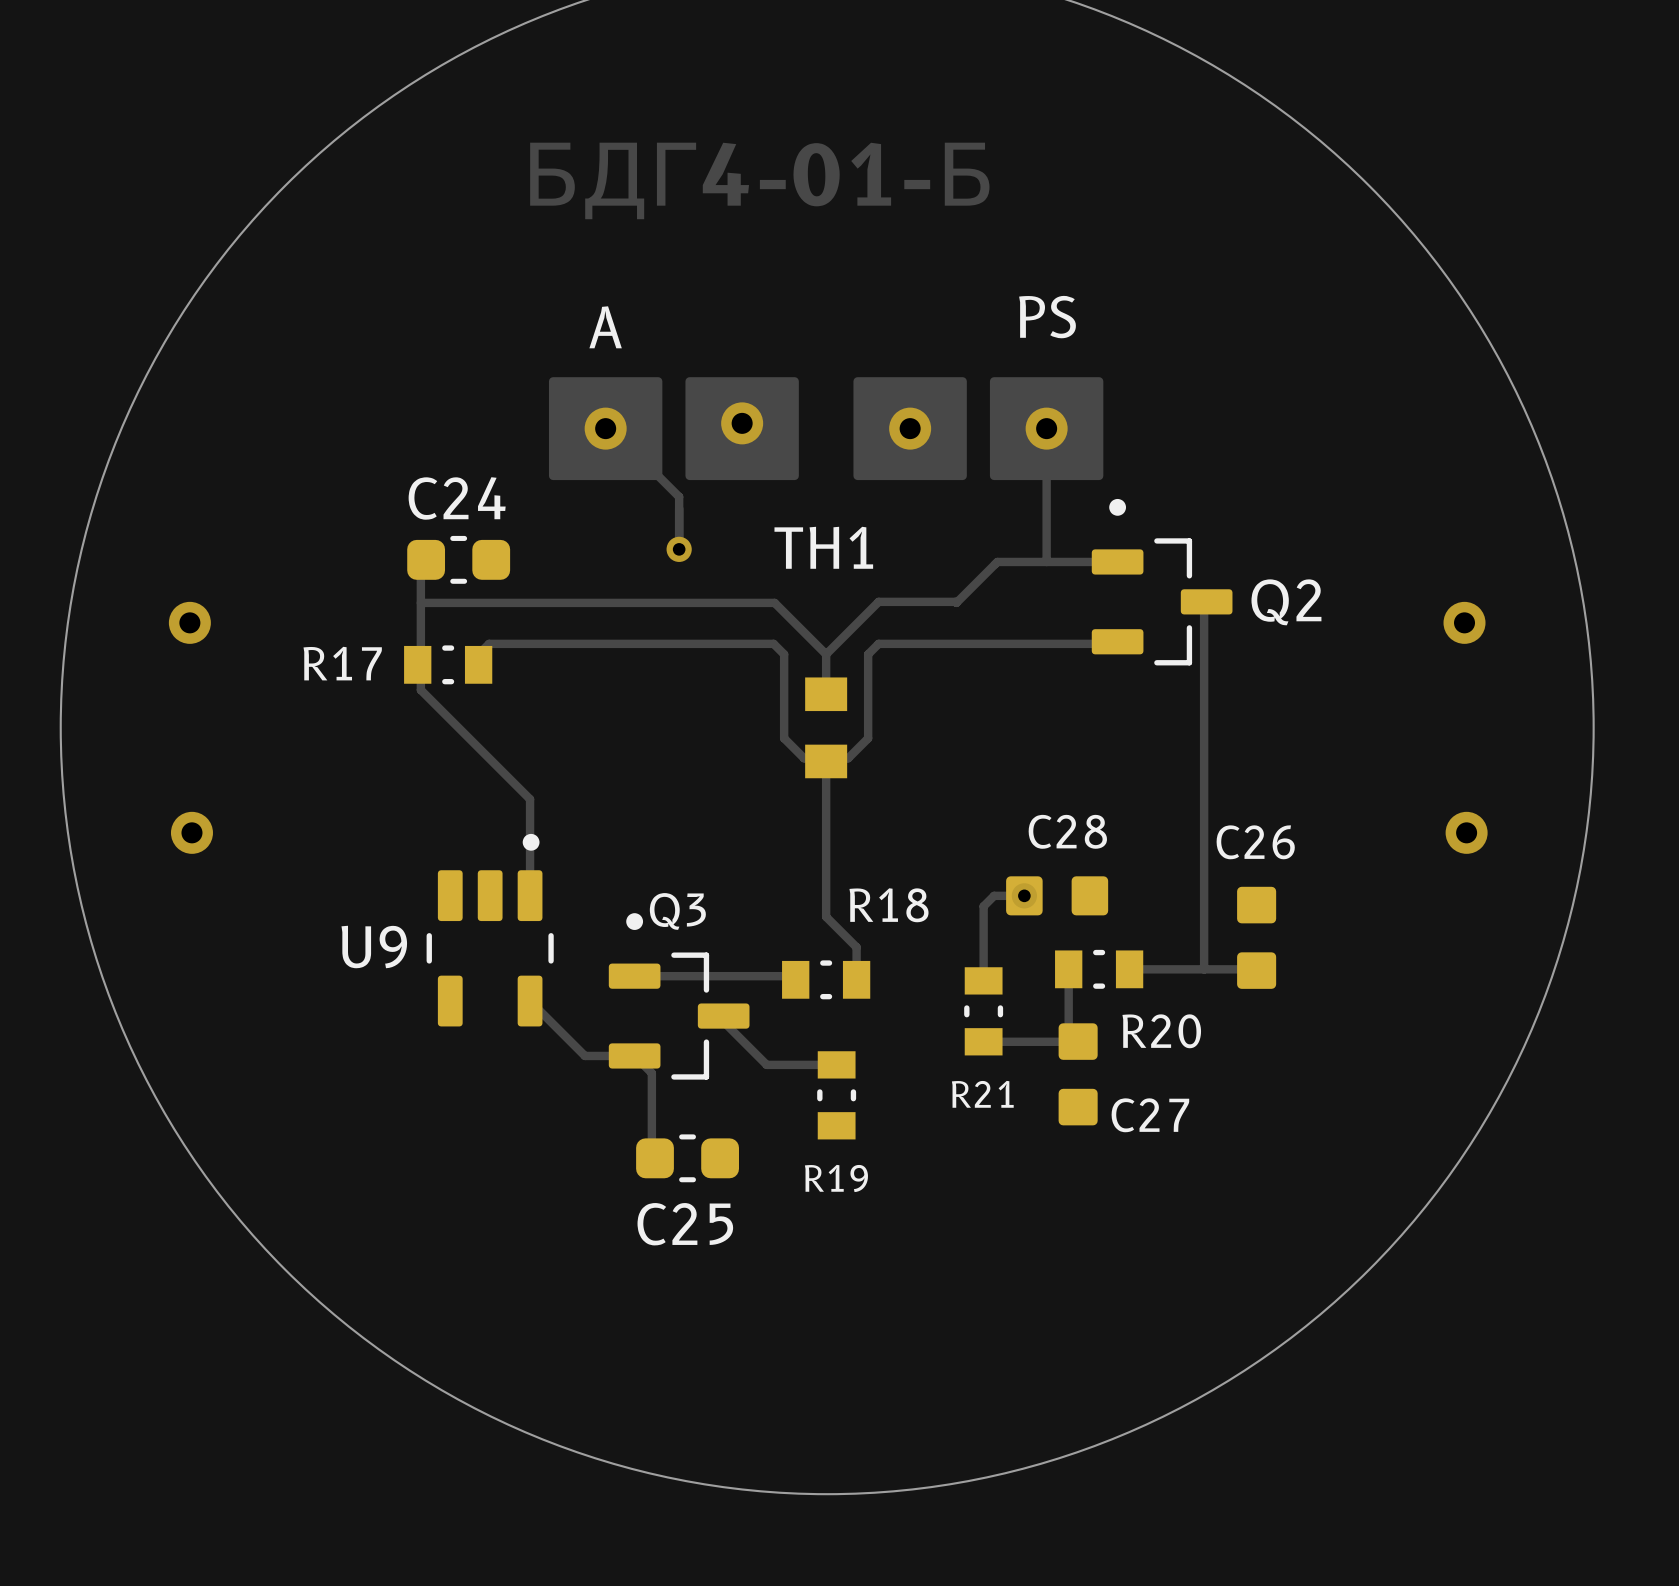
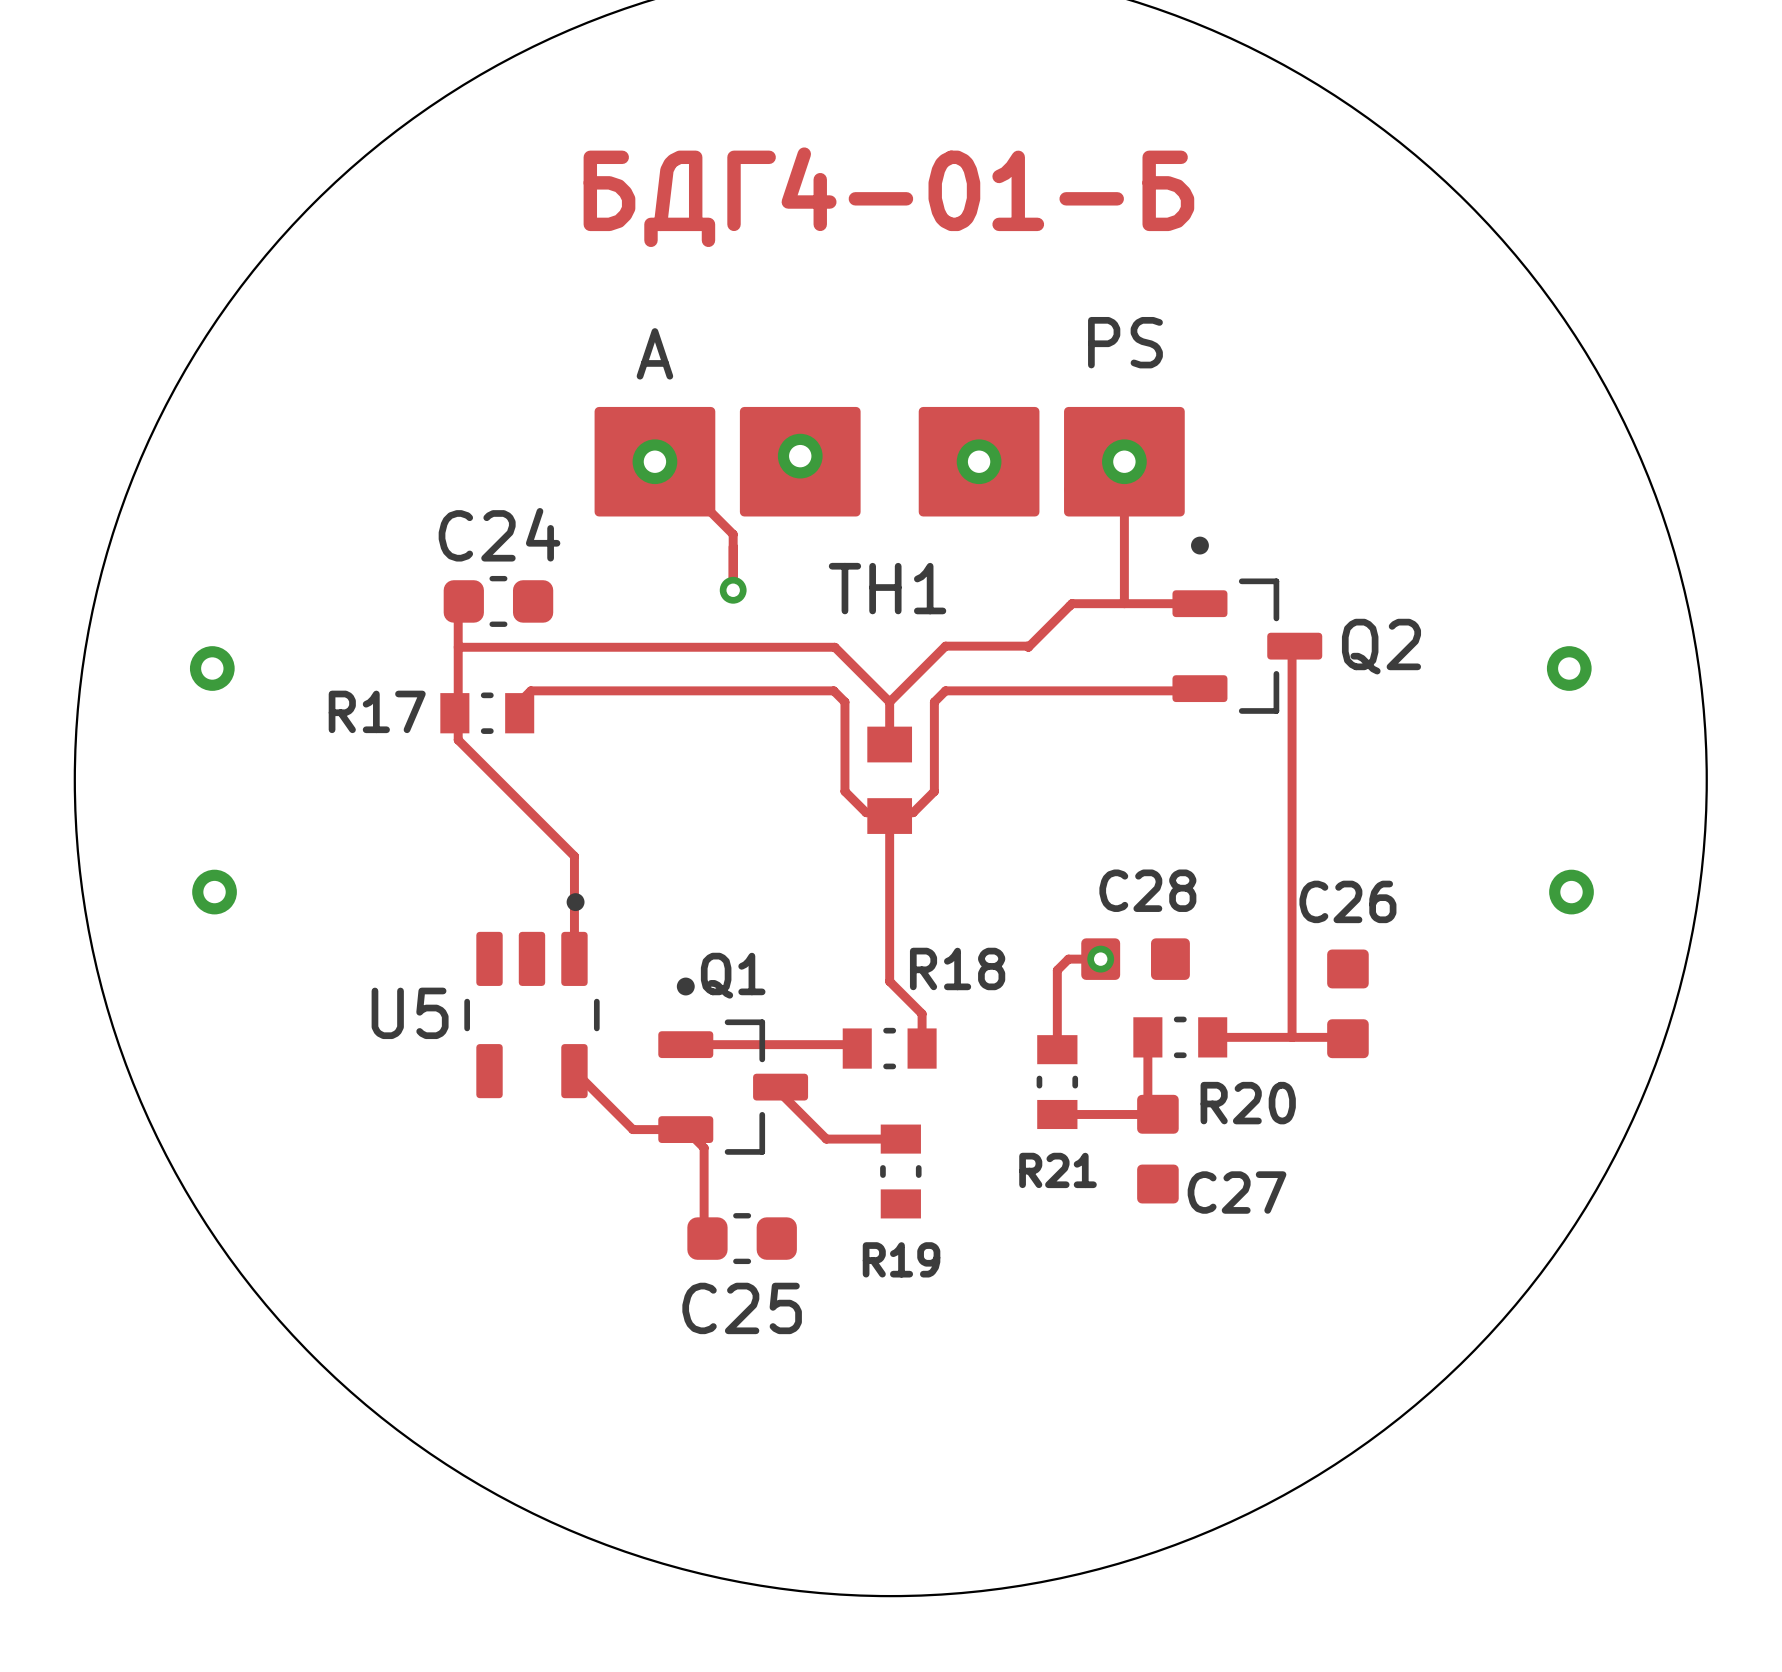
Q3 name: Q3 (677, 911) -> Q1 (733, 975)
U9 name: U9 (374, 947) -> U5 (410, 1013)

